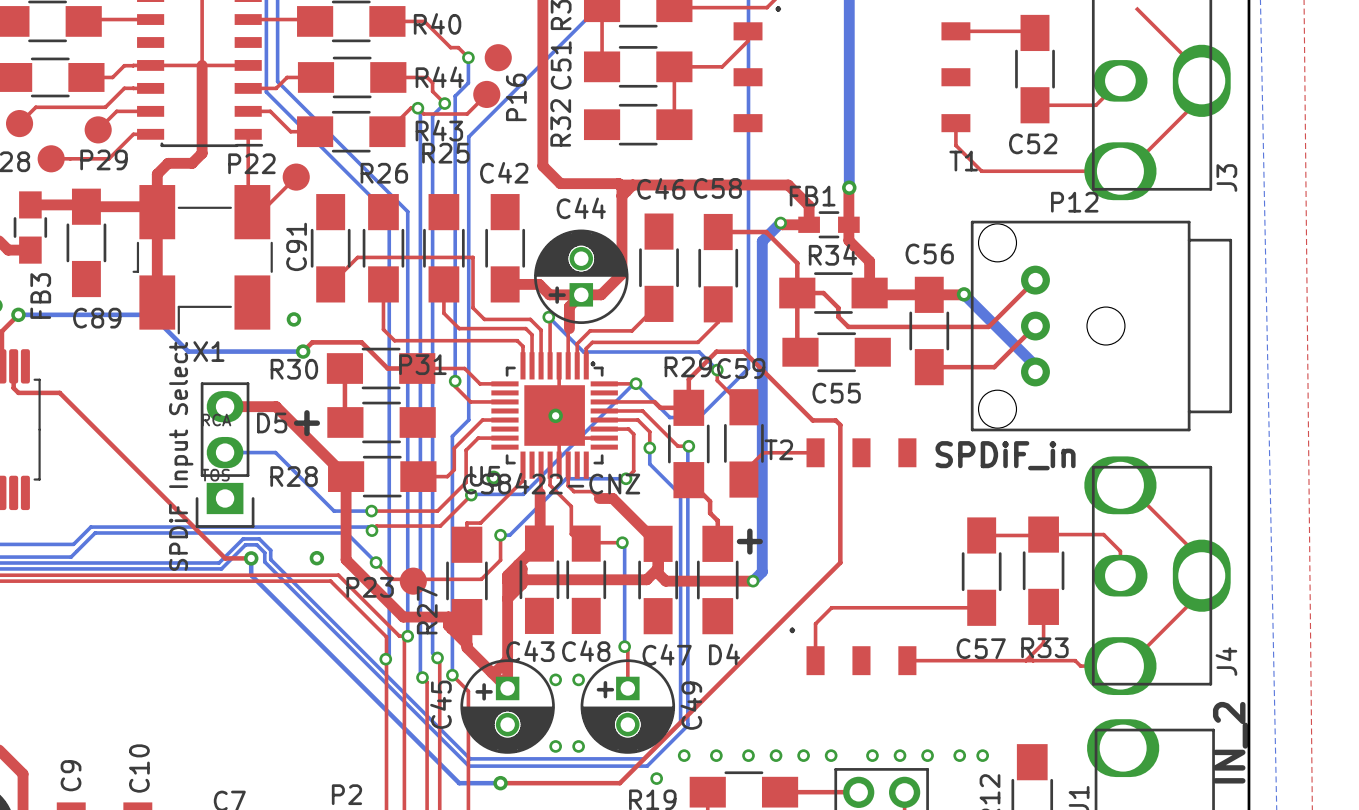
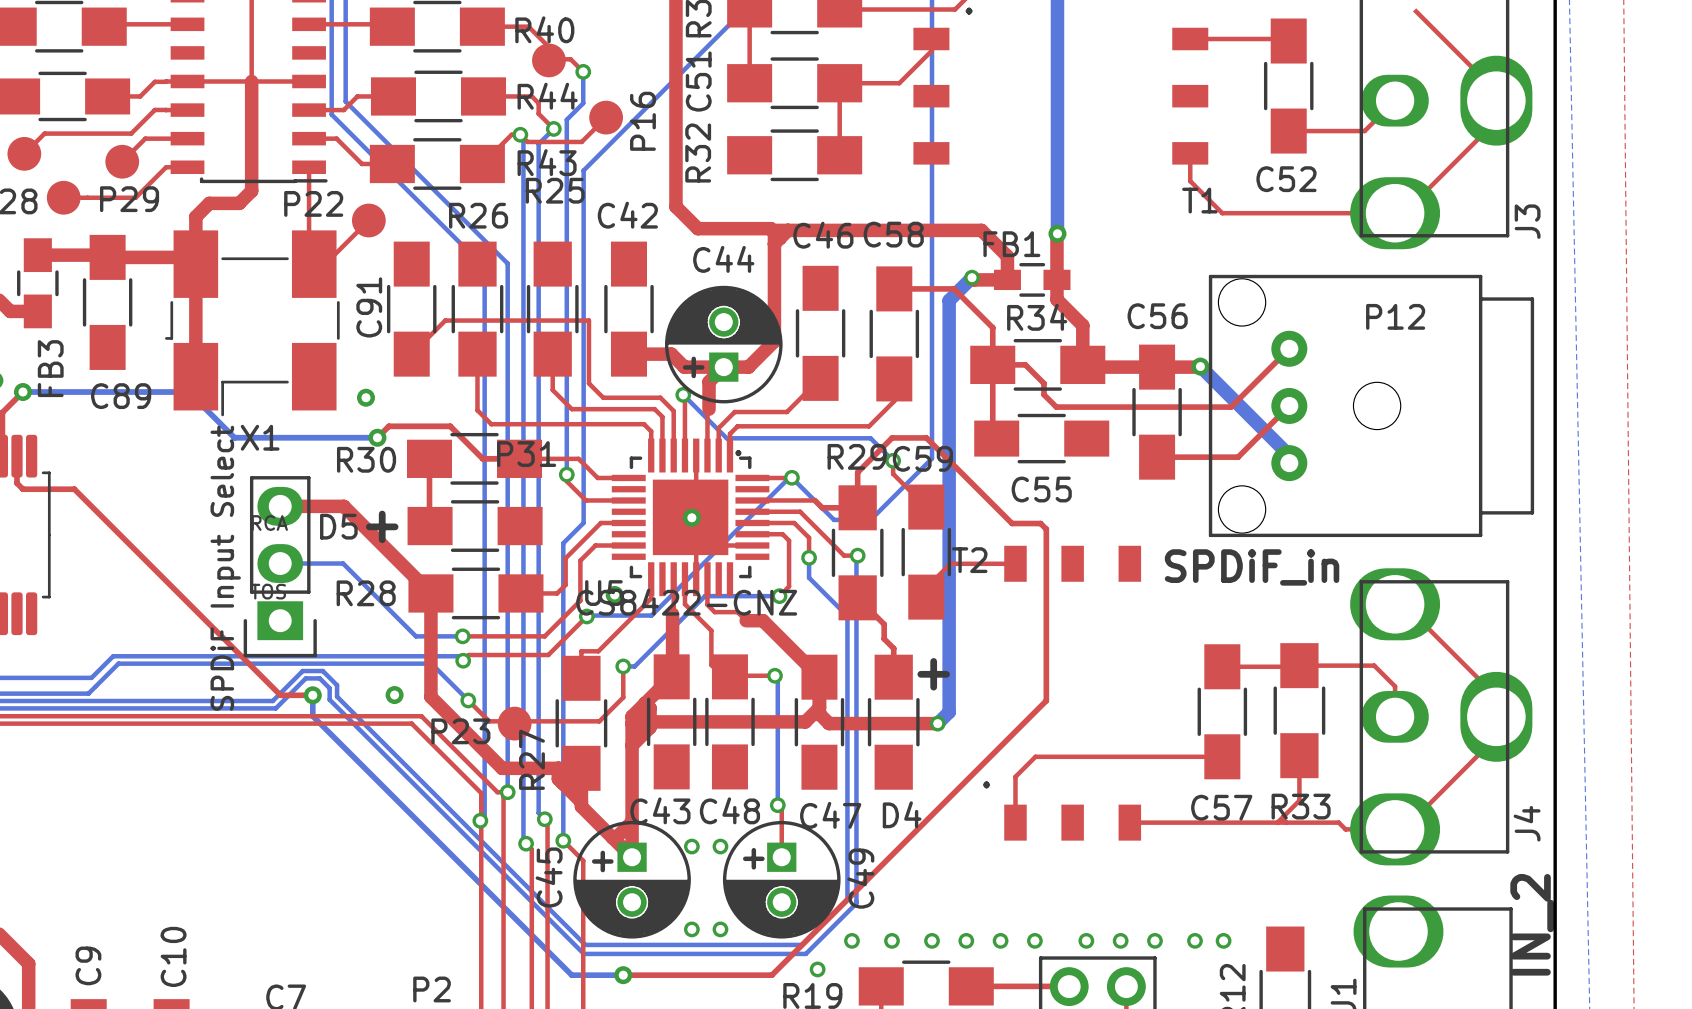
part position: (498, 57) -> (548, 60)
P12 name position: P12 (1074, 202) -> P12 (1395, 316)

